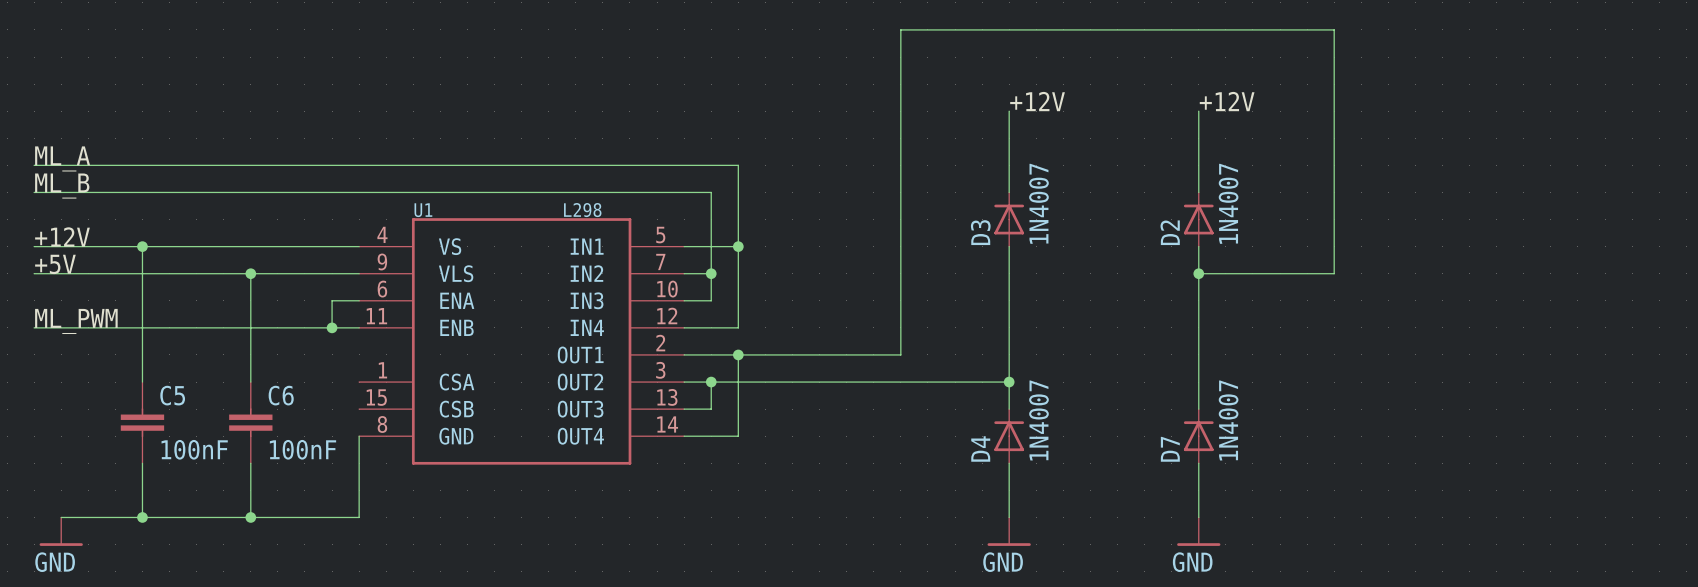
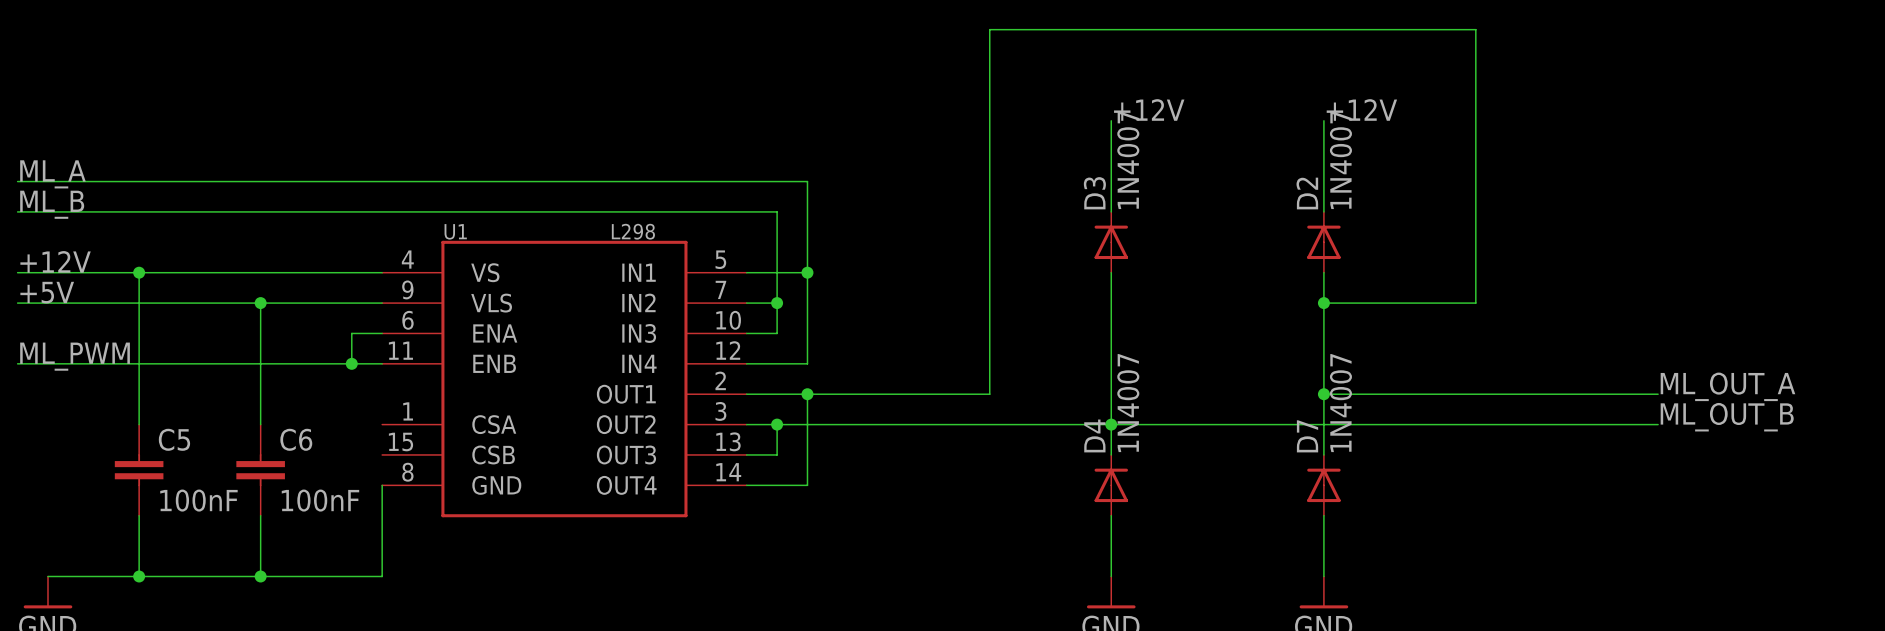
D3 value position: 1N4007 (1038, 203) -> 1N4007 (1128, 160)
D2 value position: 1N4007 (1228, 203) -> 1N4007 (1340, 160)
D3 name position: D3 (980, 232) -> D3 (1094, 193)
D2 name position: D2 (1170, 232) -> D2 (1307, 193)
label: none -> ML_OUT_A (1727, 386)
wire: none -> (1323, 394) (1658, 394)
junction: none -> (1323, 394)
label: none -> ML_OUT_B (1727, 417)
wire: none -> (1111, 424) (1658, 424)
D4 value position: 1N4007 (1038, 420) -> 1N4007 (1128, 403)
D7 value position: 1N4007 (1228, 420) -> 1N4007 (1340, 403)
D4 name position: D4 (980, 448) -> D4 (1094, 435)
D7 name position: D7 (1170, 449) -> D7 (1307, 436)

